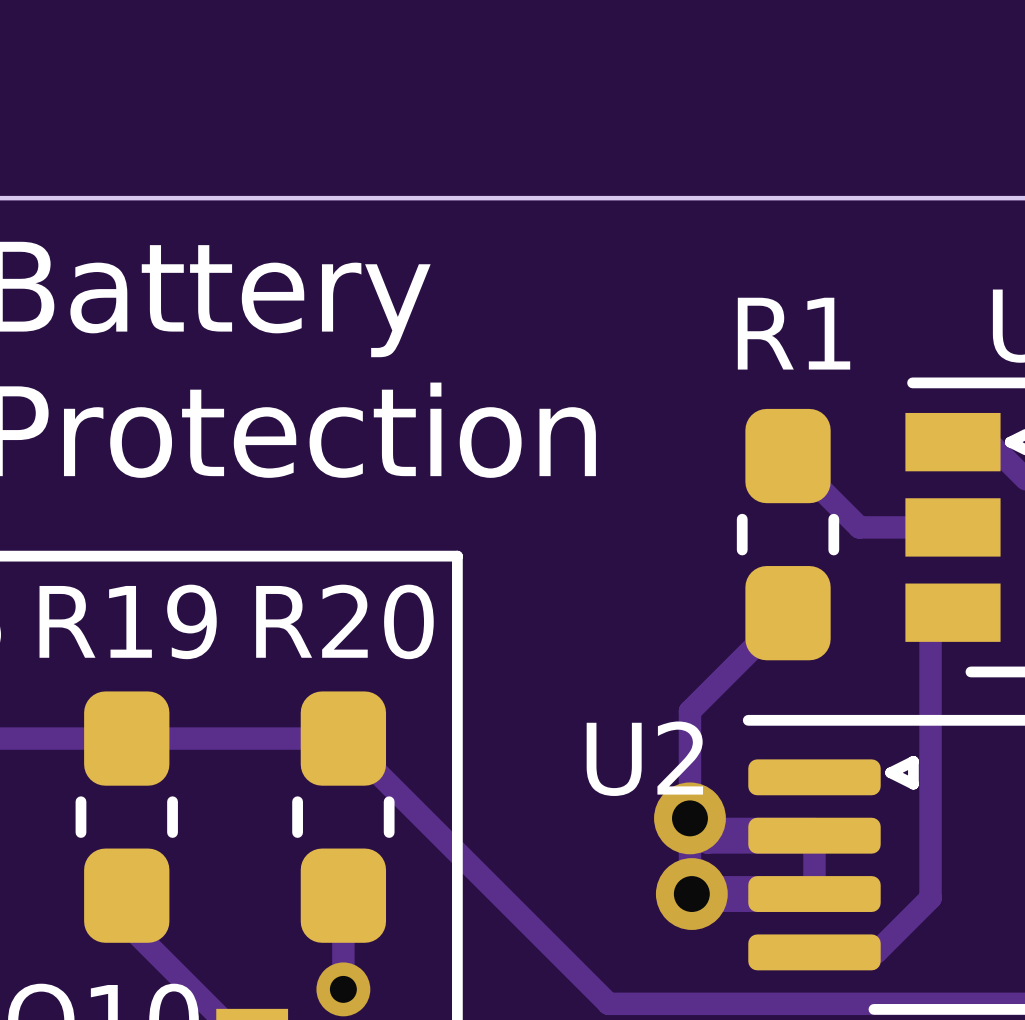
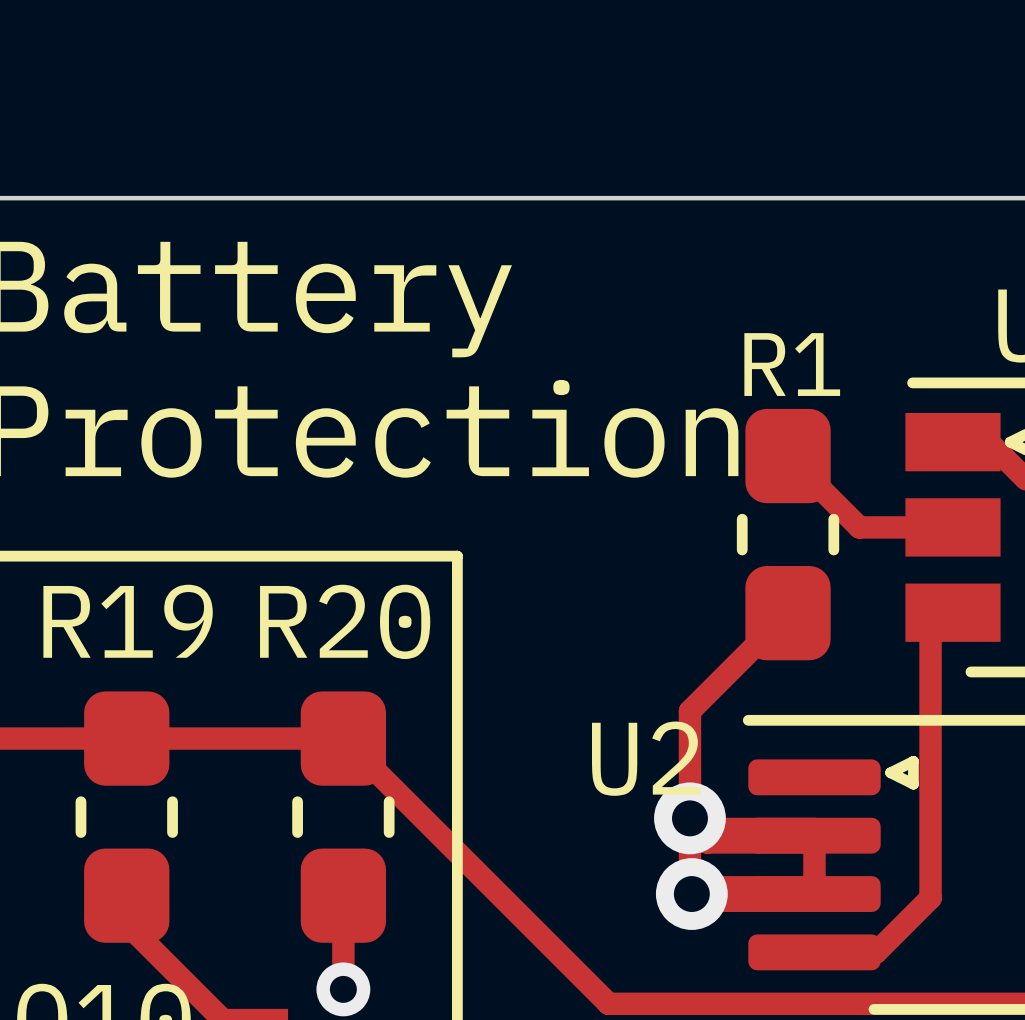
R1 name position: R1 (794, 333) -> R1 (792, 364)

